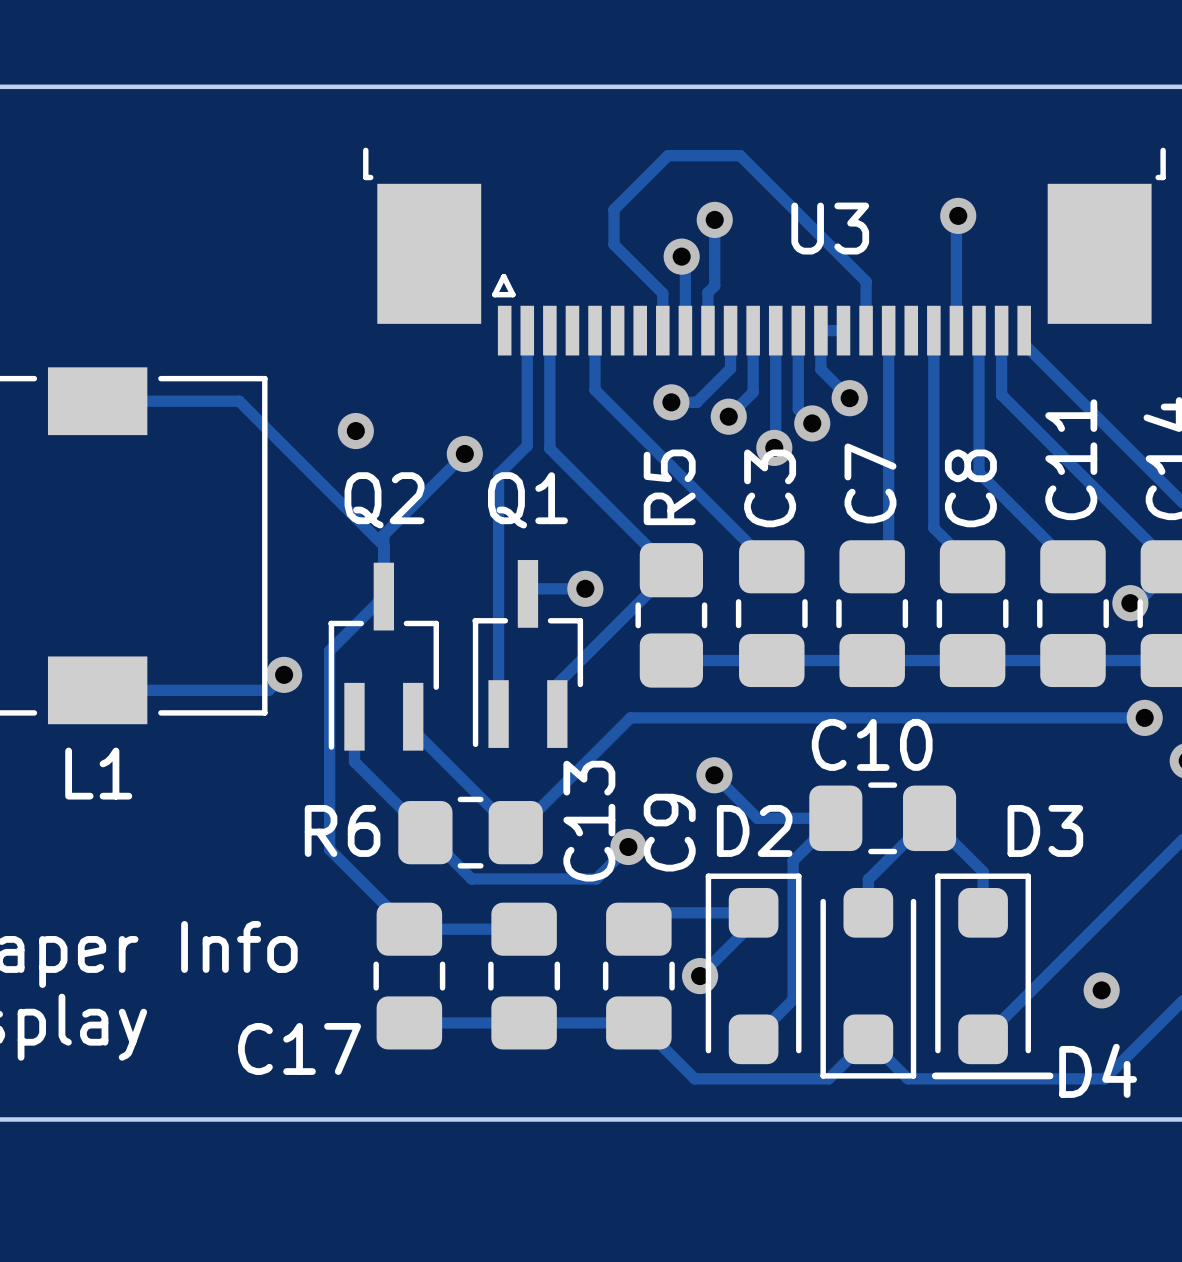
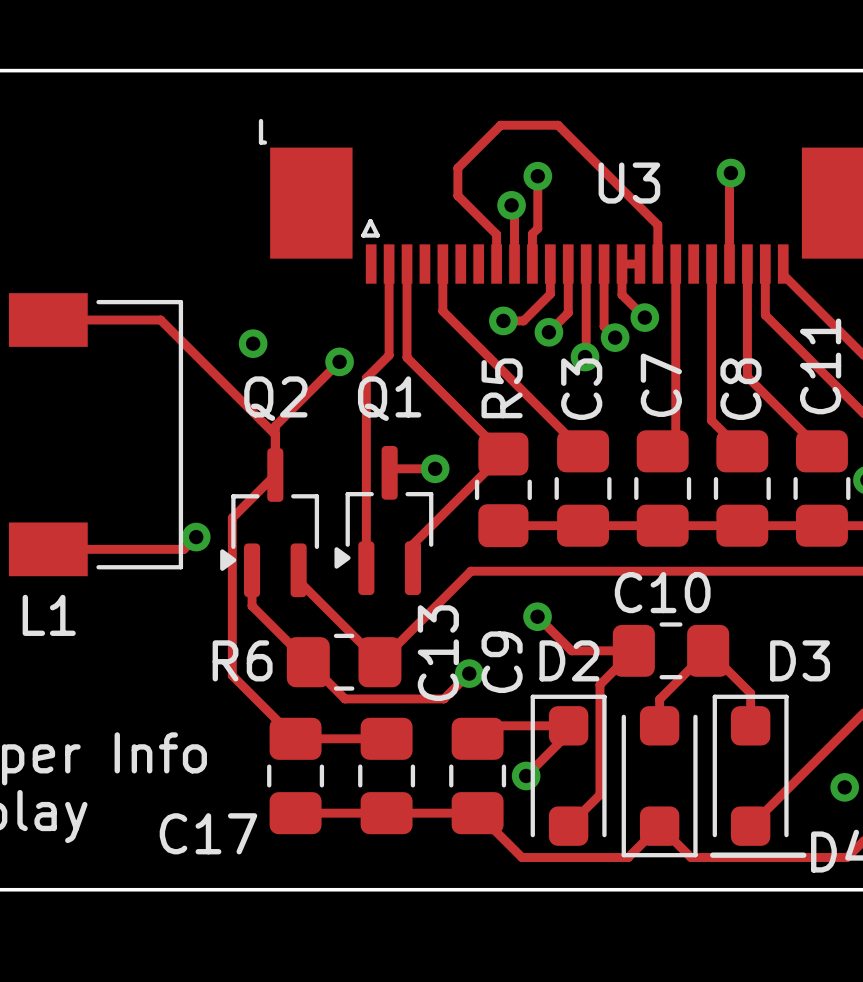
Q1 footprint: [472, 560, 584, 748] -> [334, 445, 434, 596]
Q2 footprint: [328, 562, 439, 751] -> [220, 448, 320, 598]

